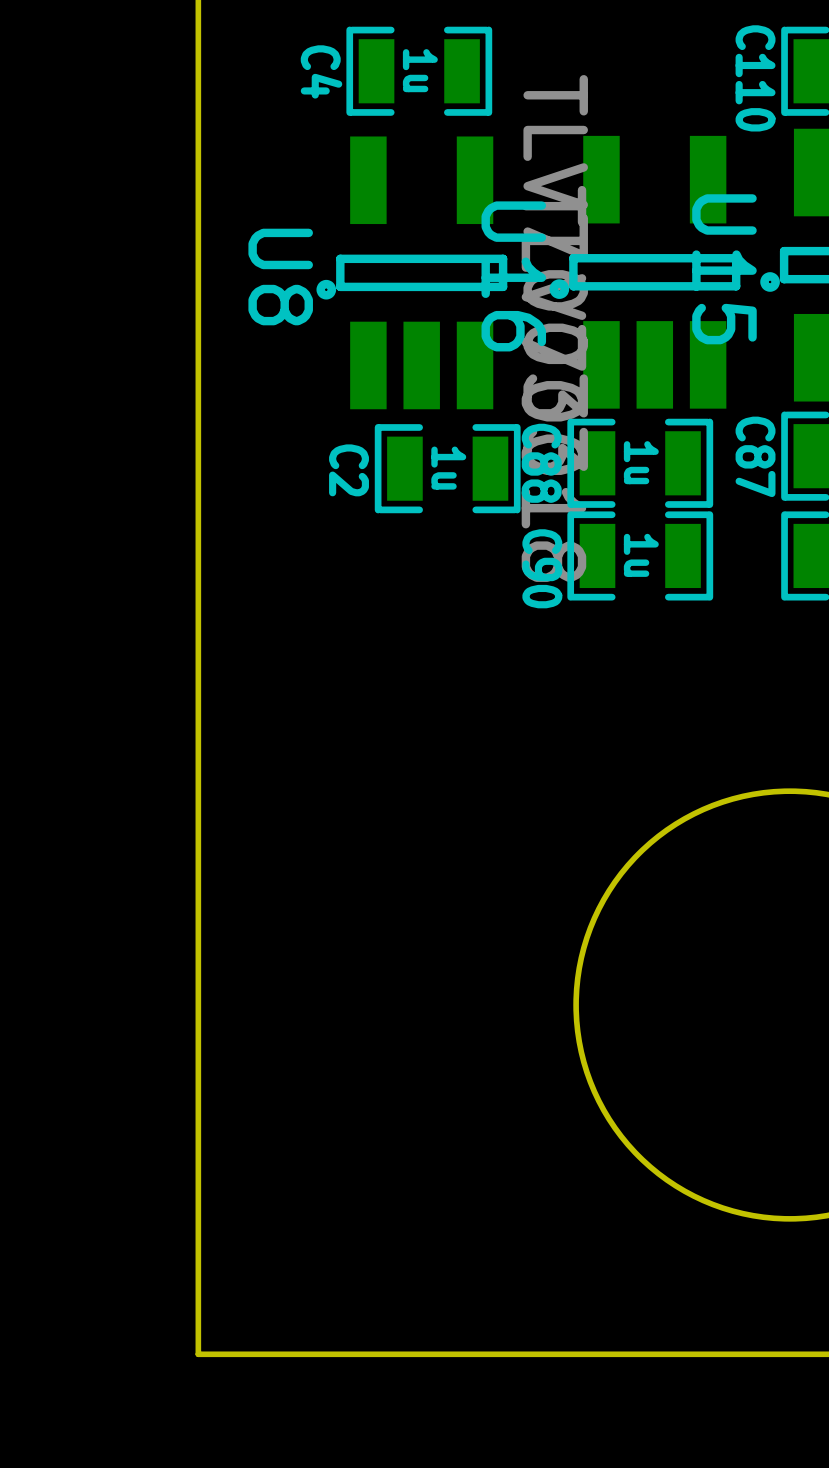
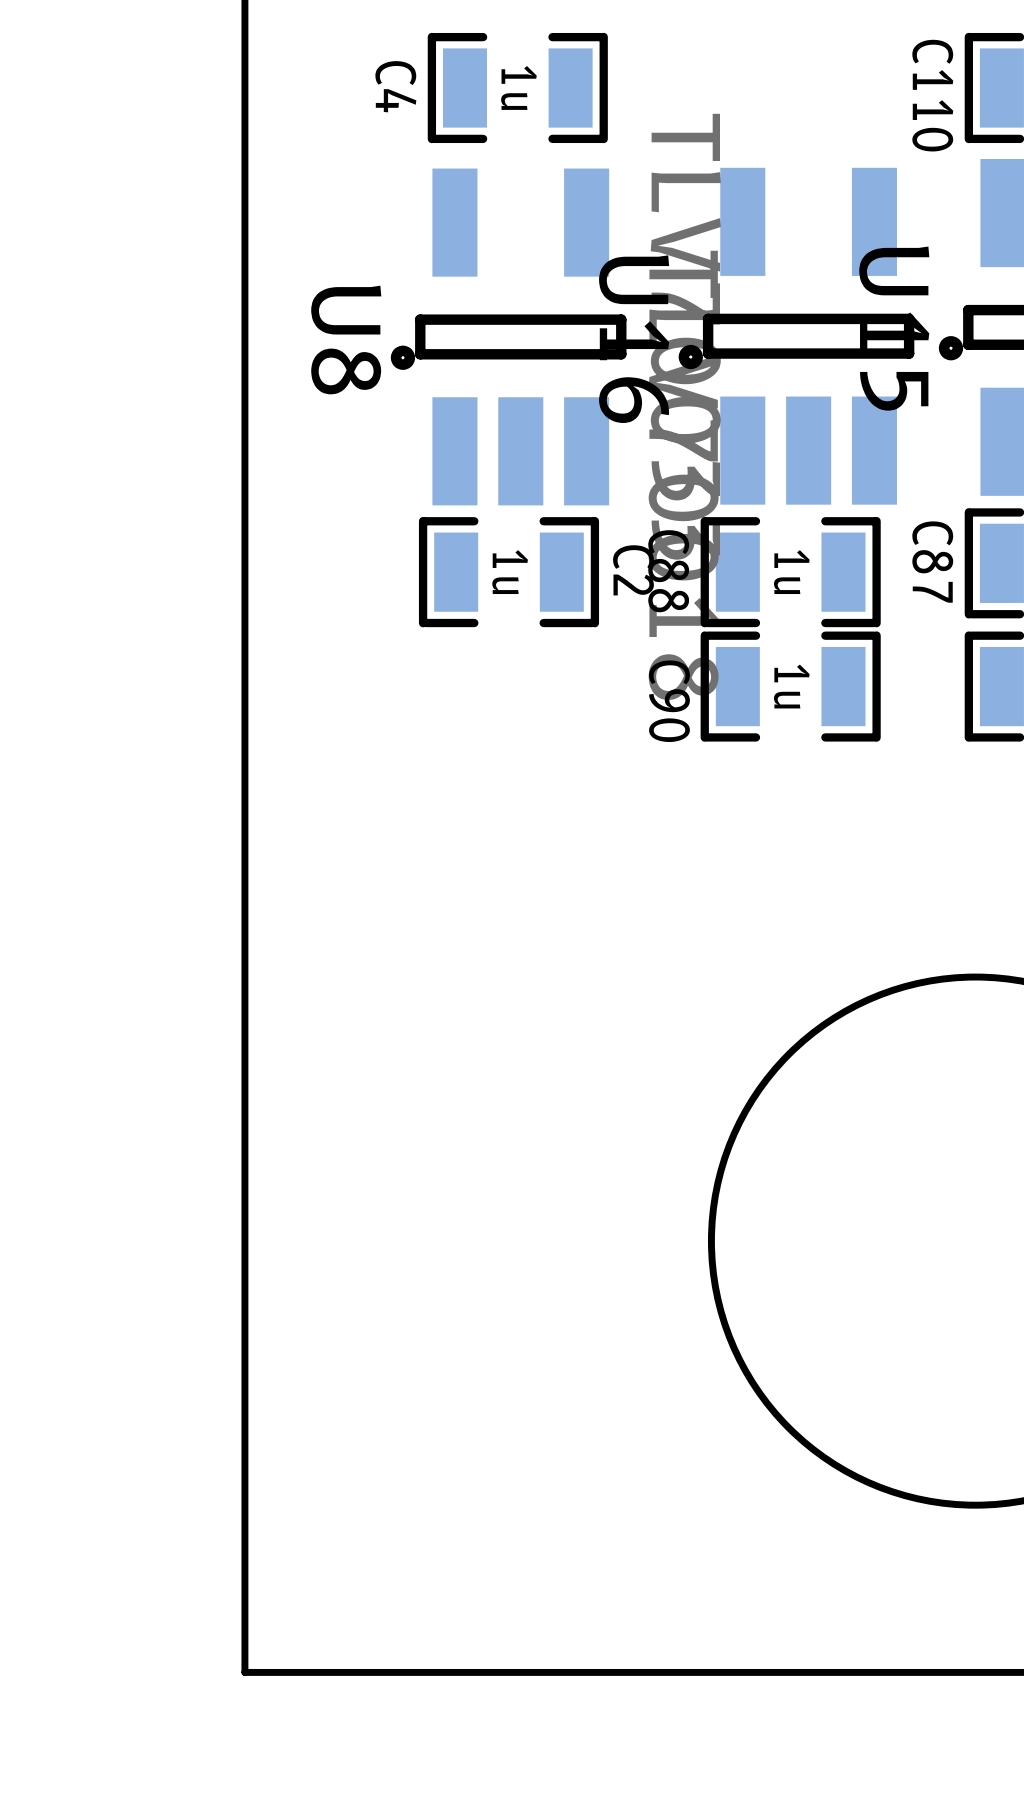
C2 position: (447, 468) -> (509, 572)
C2 name position: C2 (349, 470) -> C2 (633, 570)

